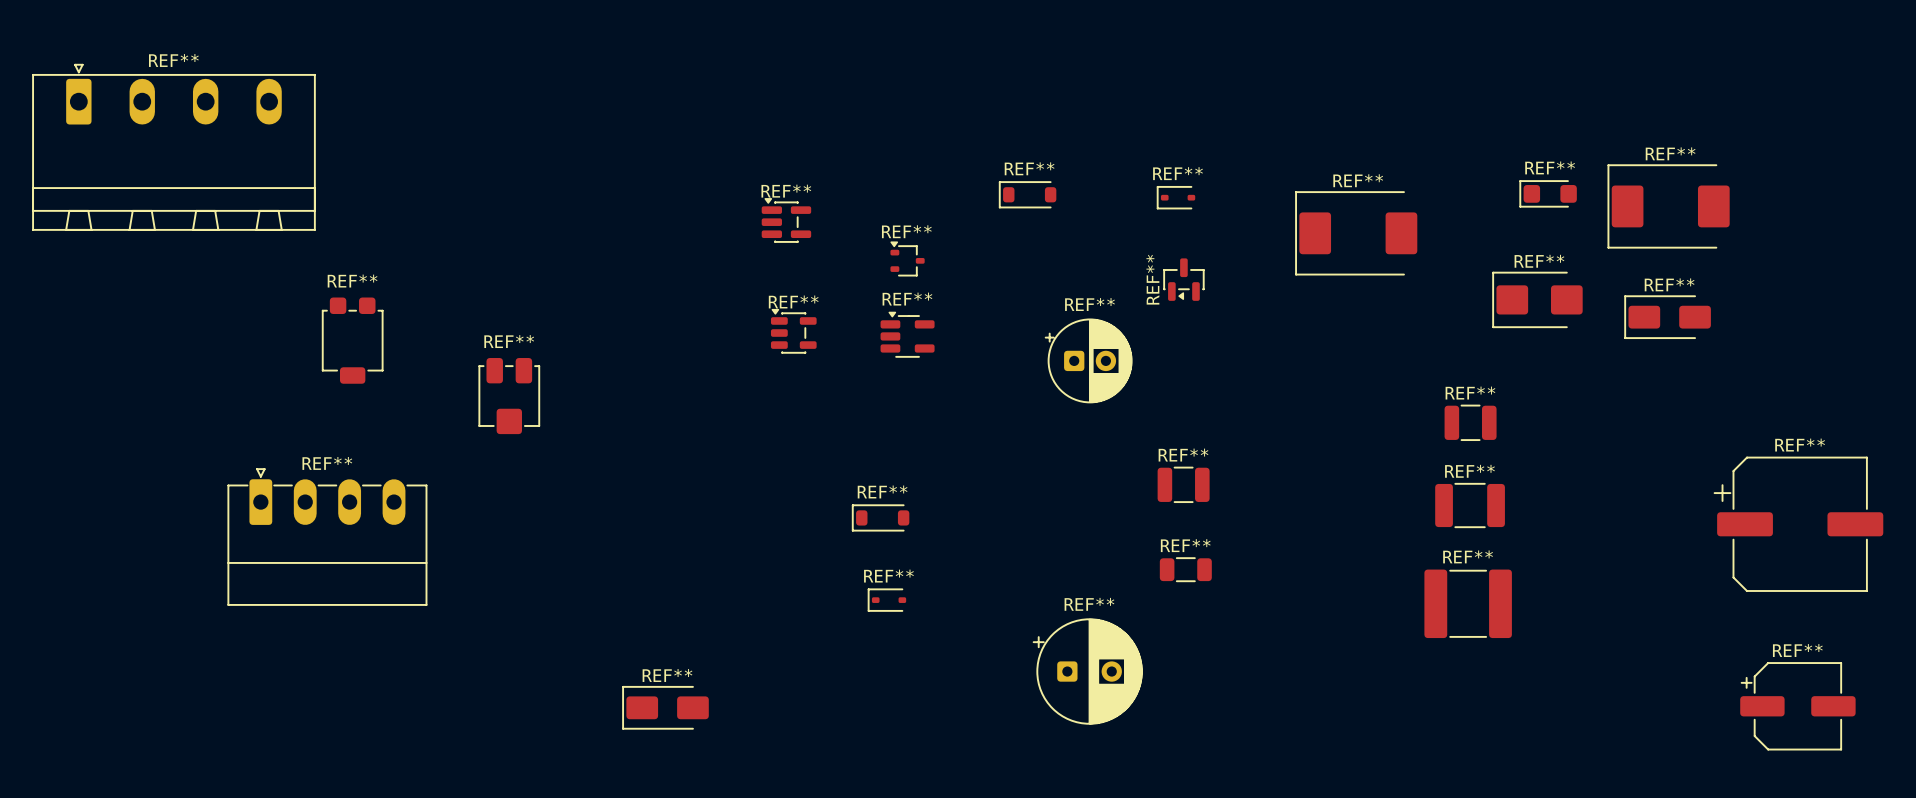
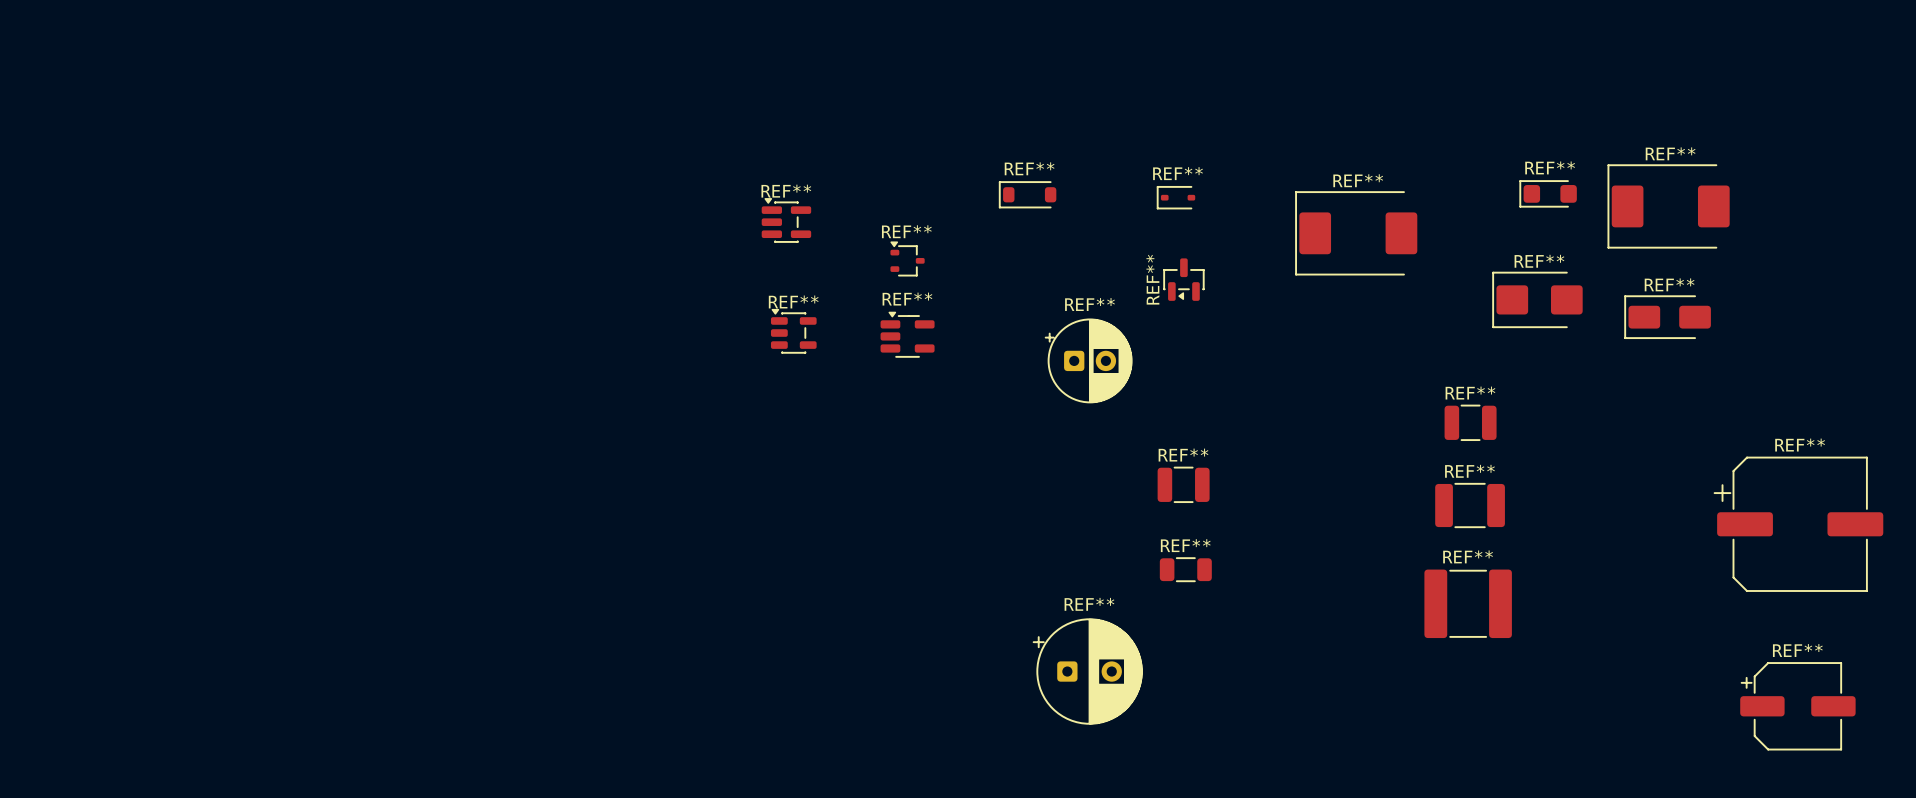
REF**: (173, 147) -> none
REF**: (352, 340) -> none
REF**: (509, 396) -> none
REF**: (880, 517) -> none
REF**: (327, 537) -> none
REF**: (887, 600) -> none
REF**: (665, 707) -> none

